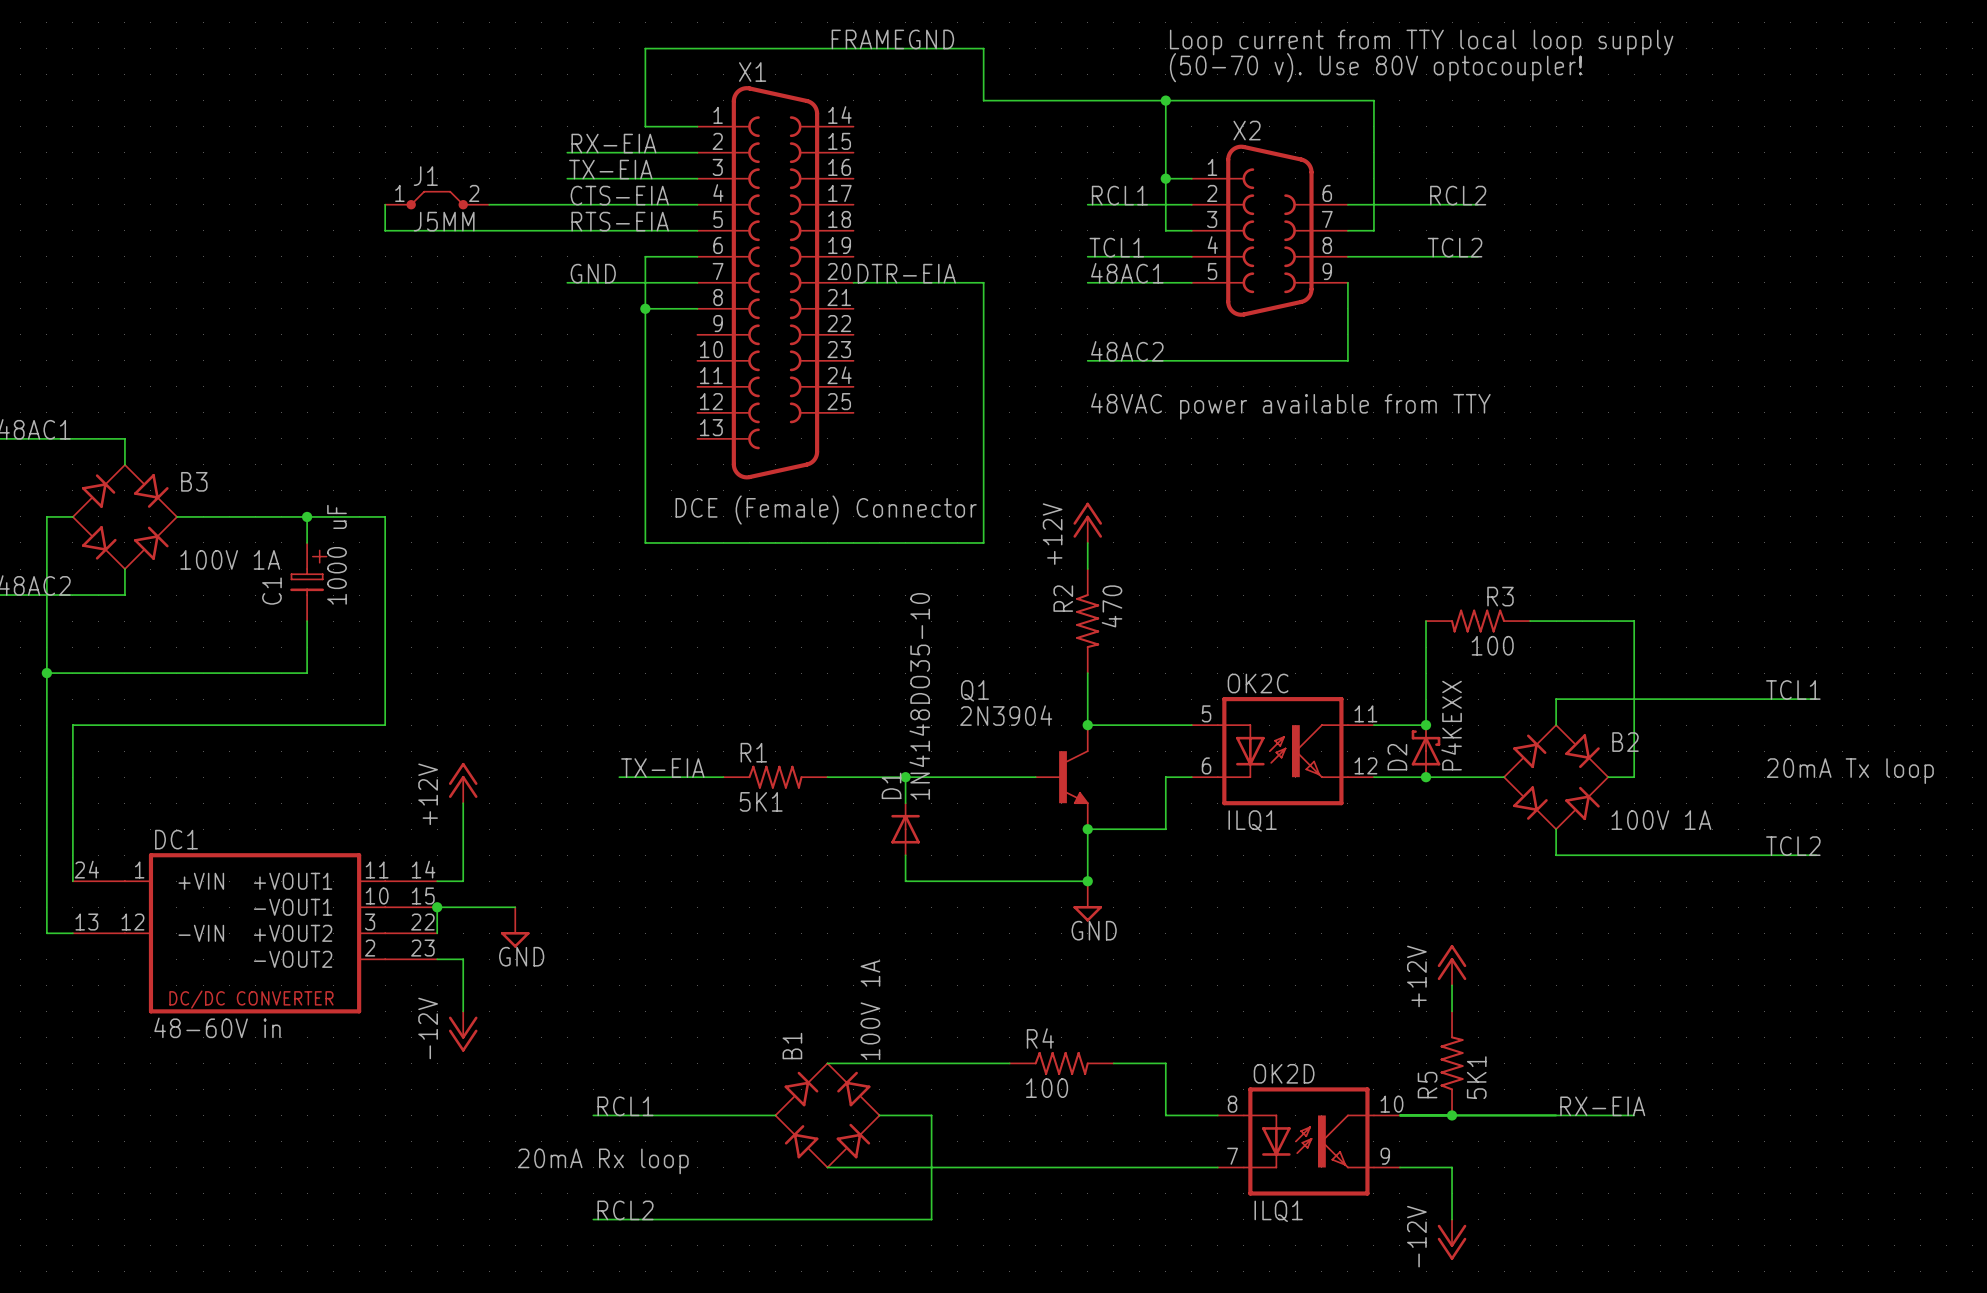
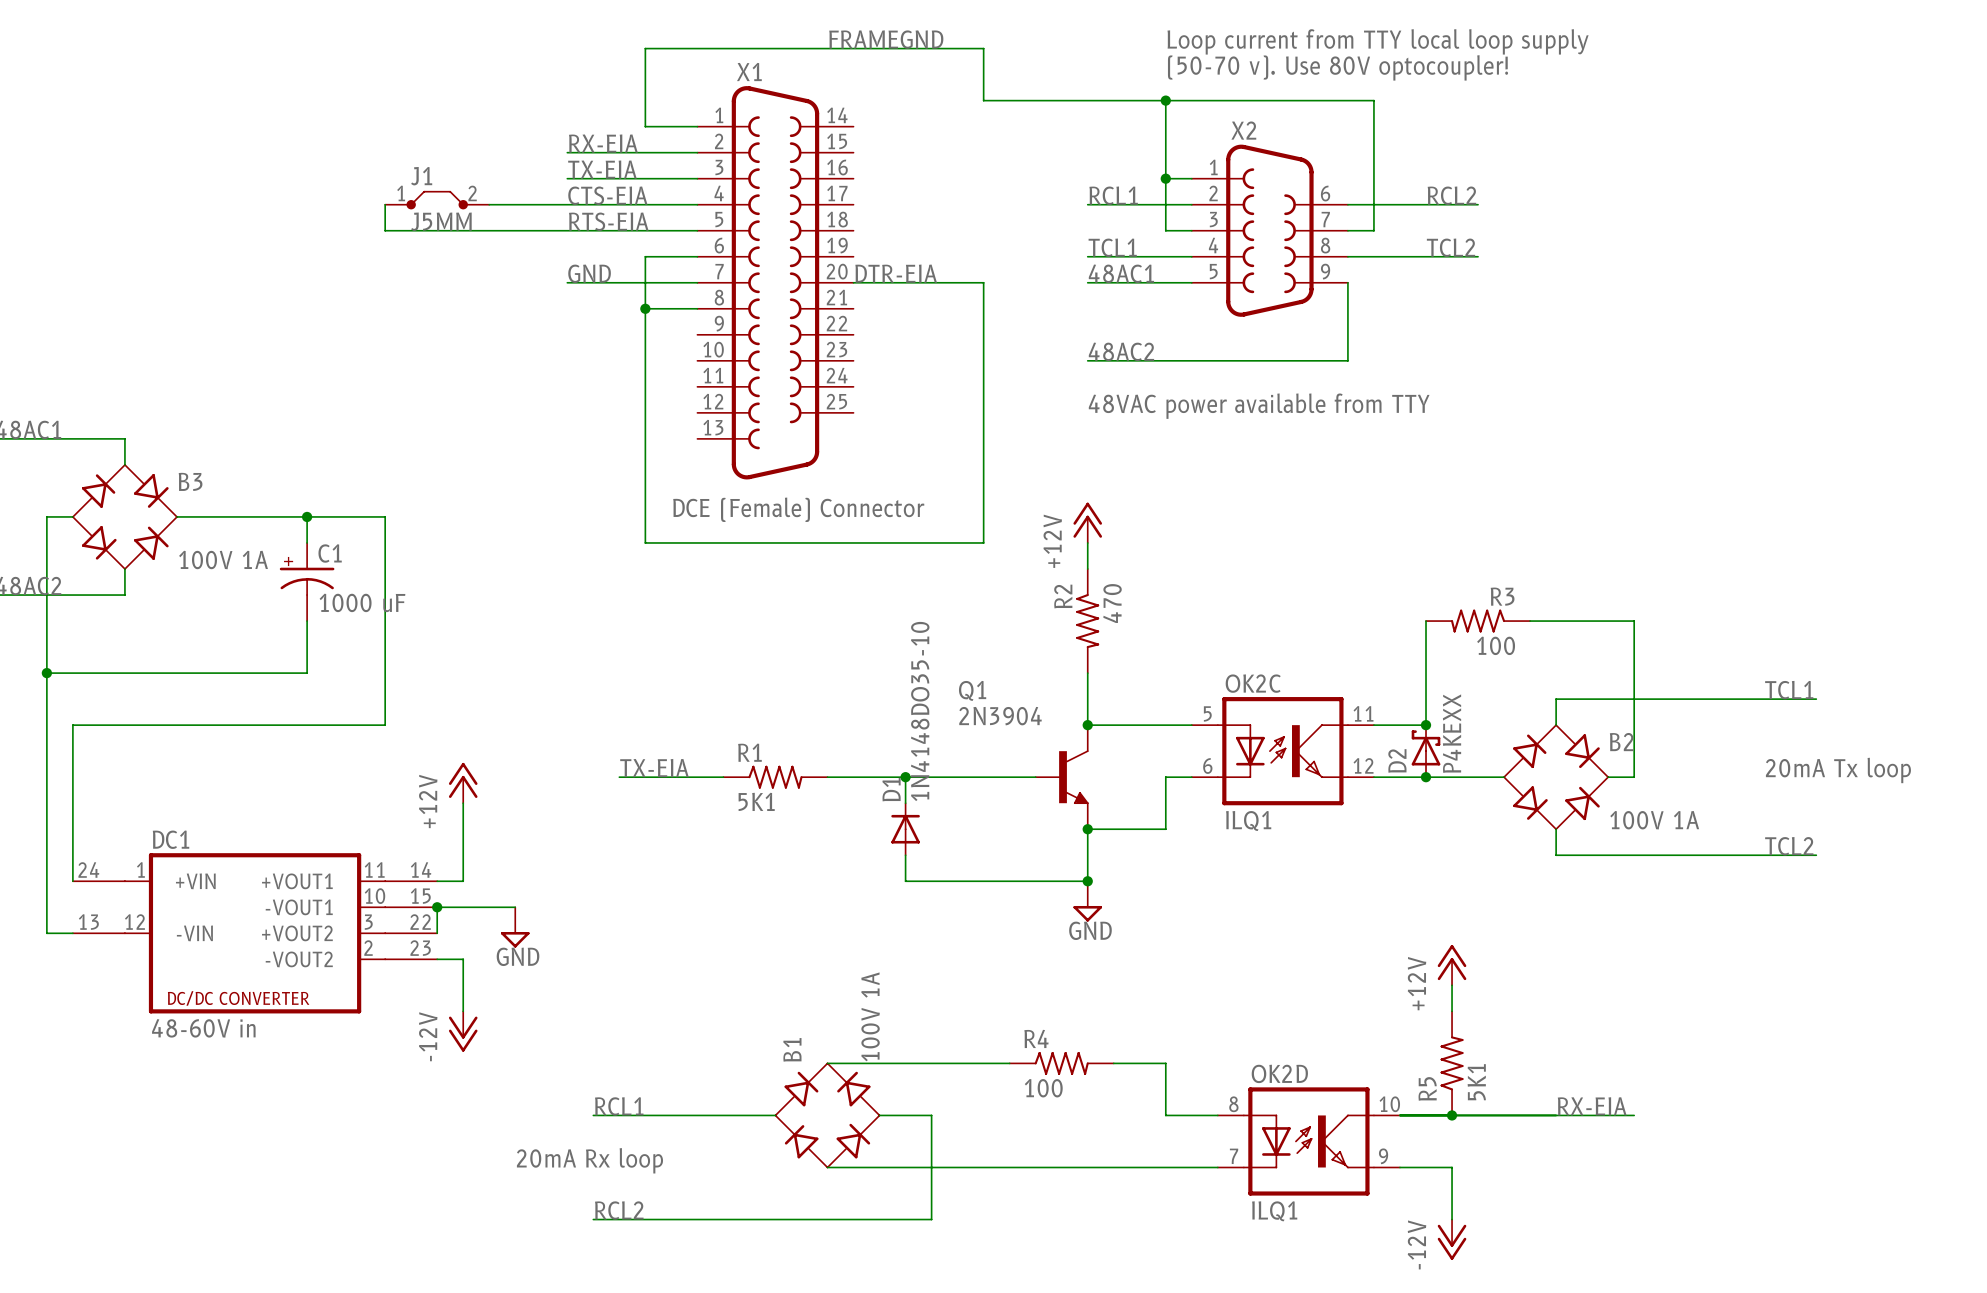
C1 symbol: [290, 542, 325, 622] -> [279, 542, 335, 622]
C1 value position: 1000 uF (337, 554) -> 1000 uF (362, 602)
C1 name position: C1 (271, 591) -> C1 (330, 553)

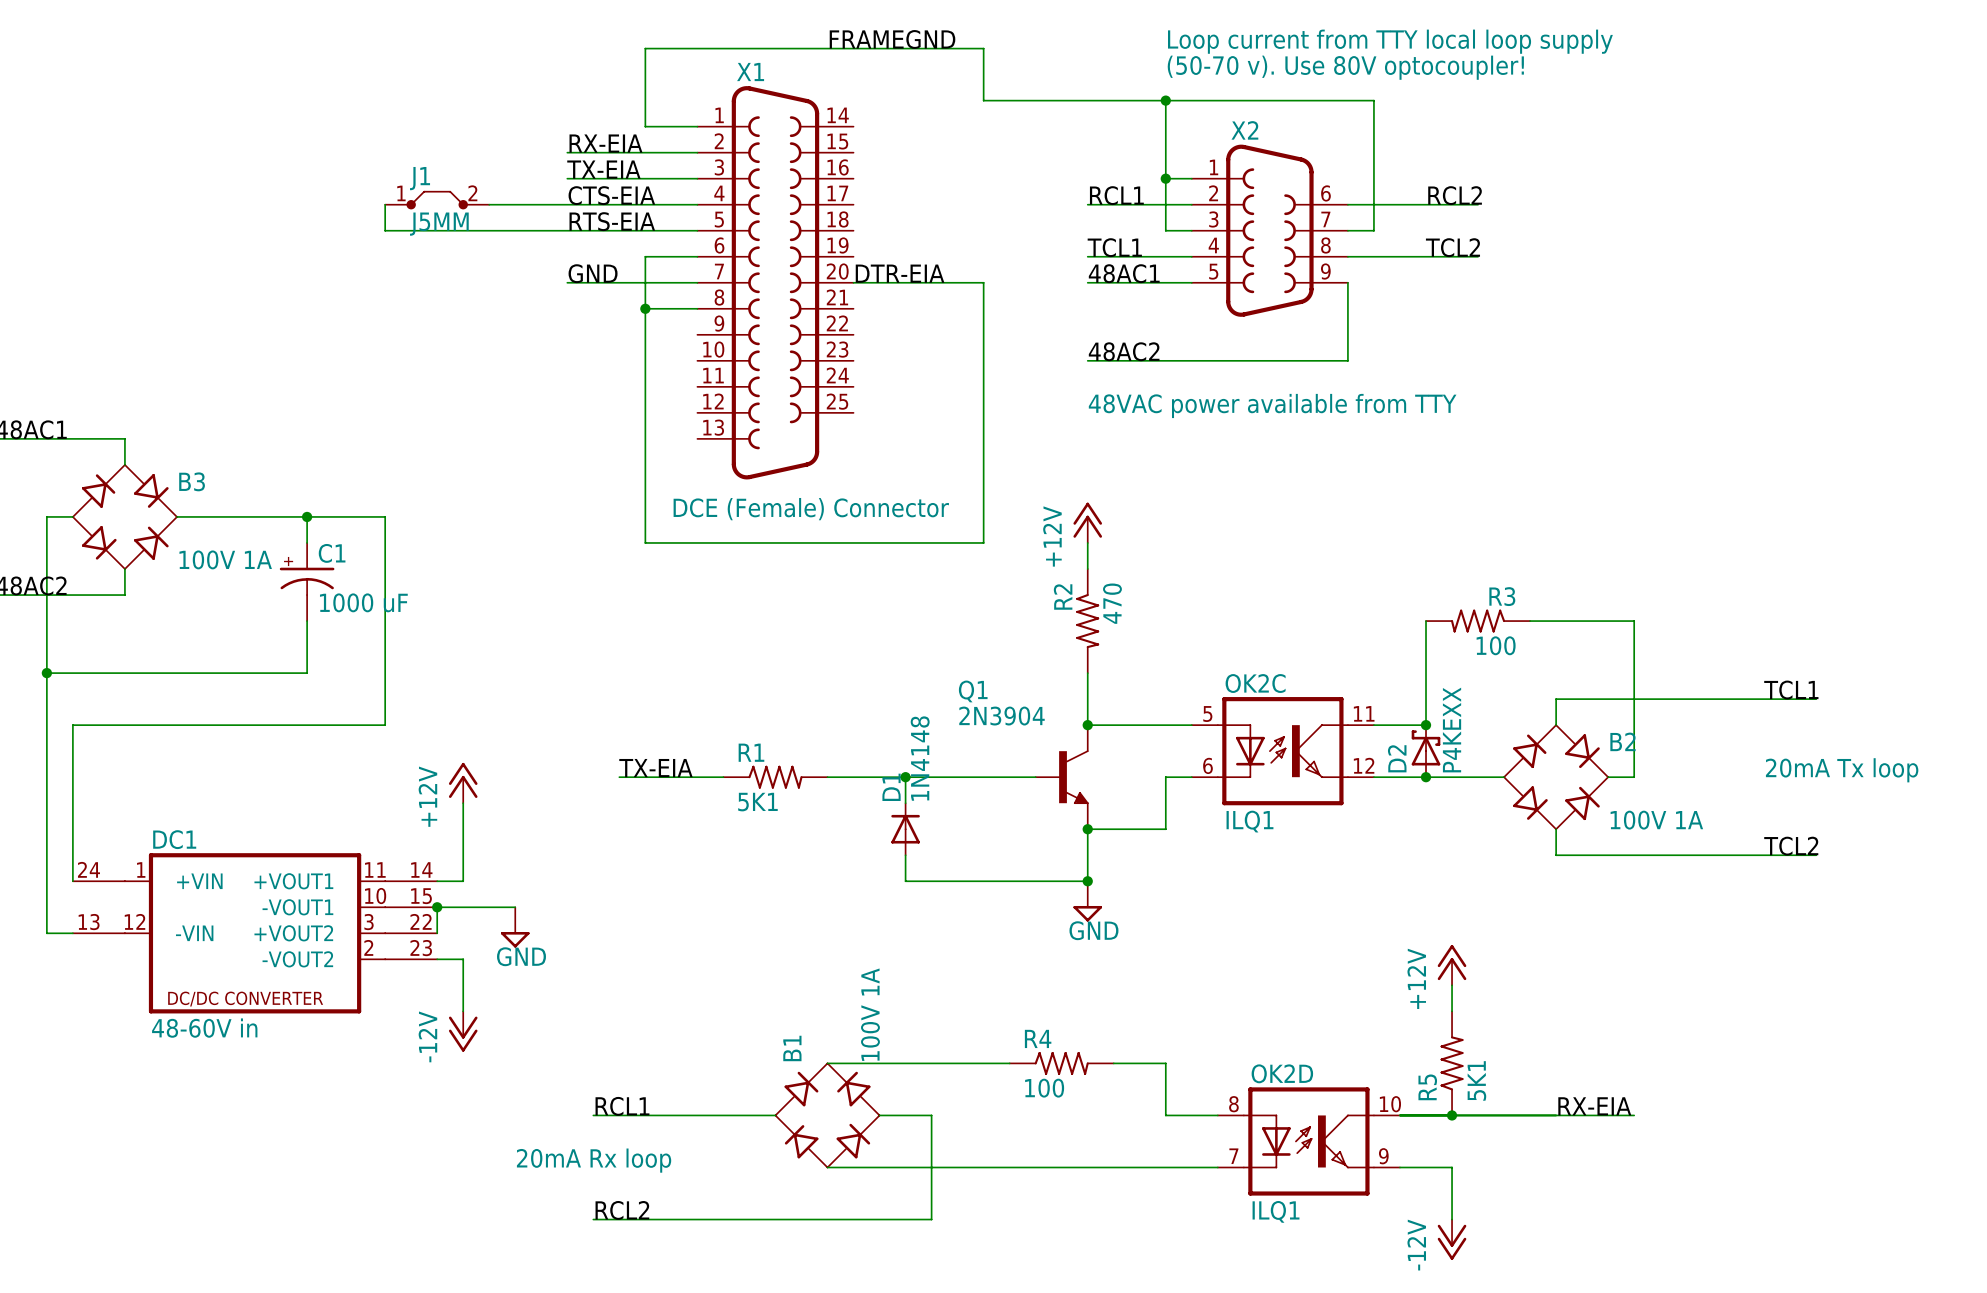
D1 value: 1N4148DO35-10 (920, 711) -> 1N4148 (920, 758)

